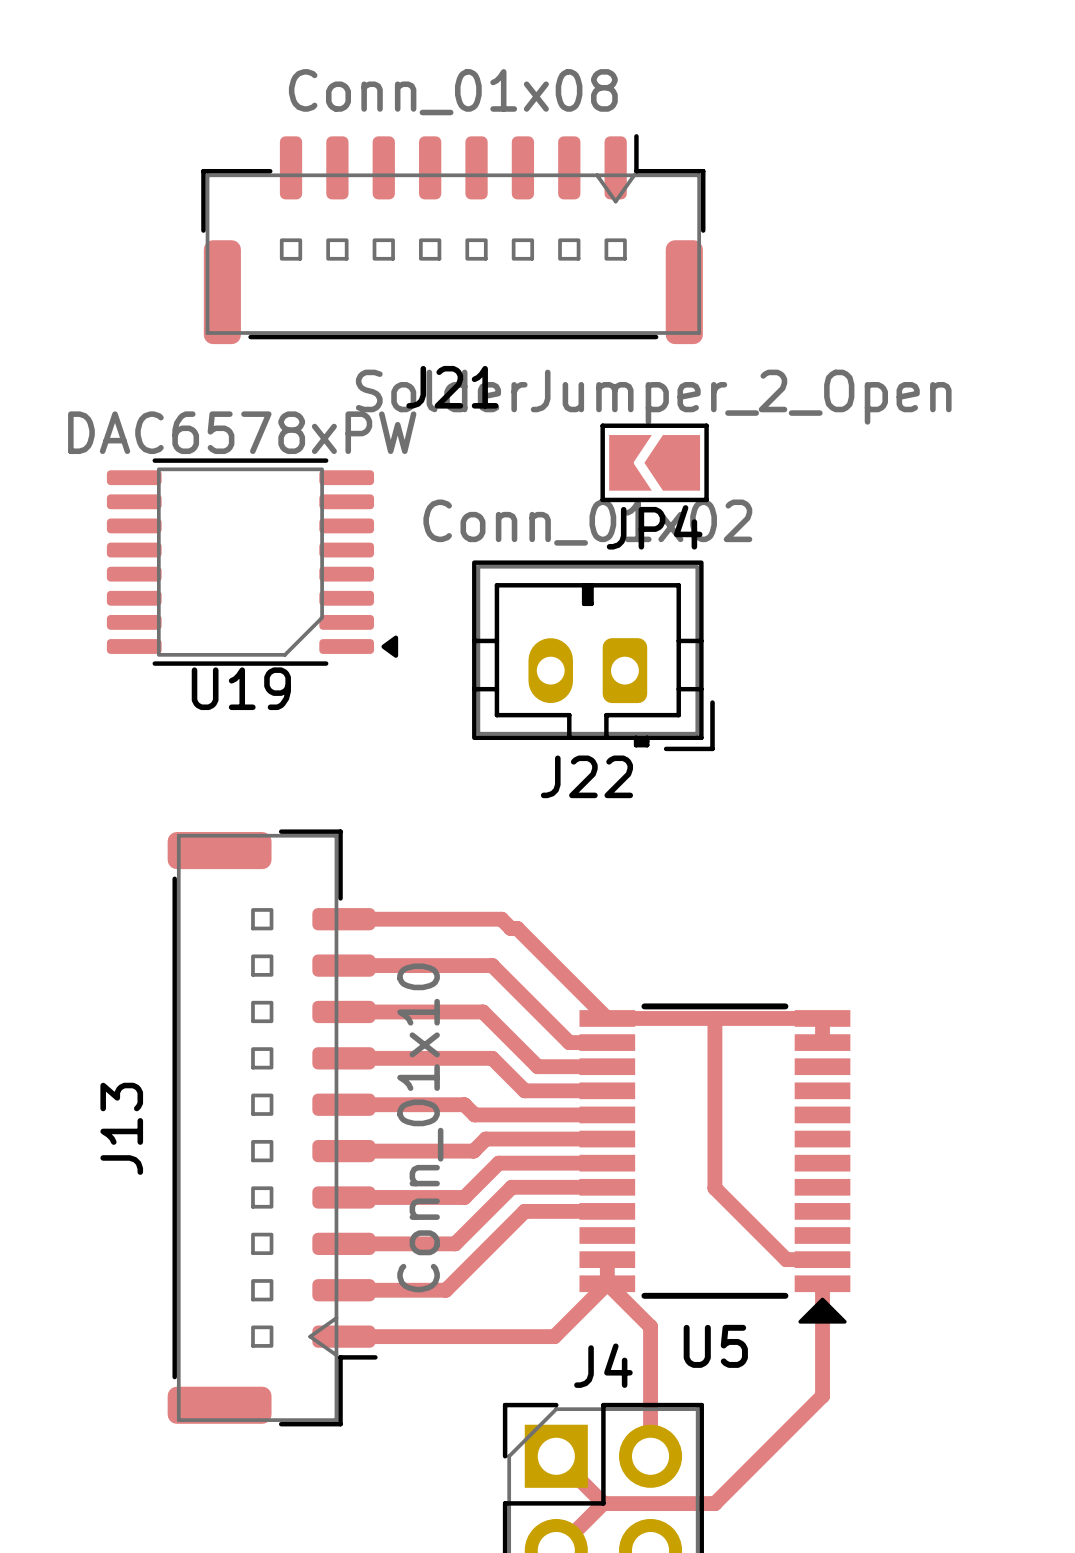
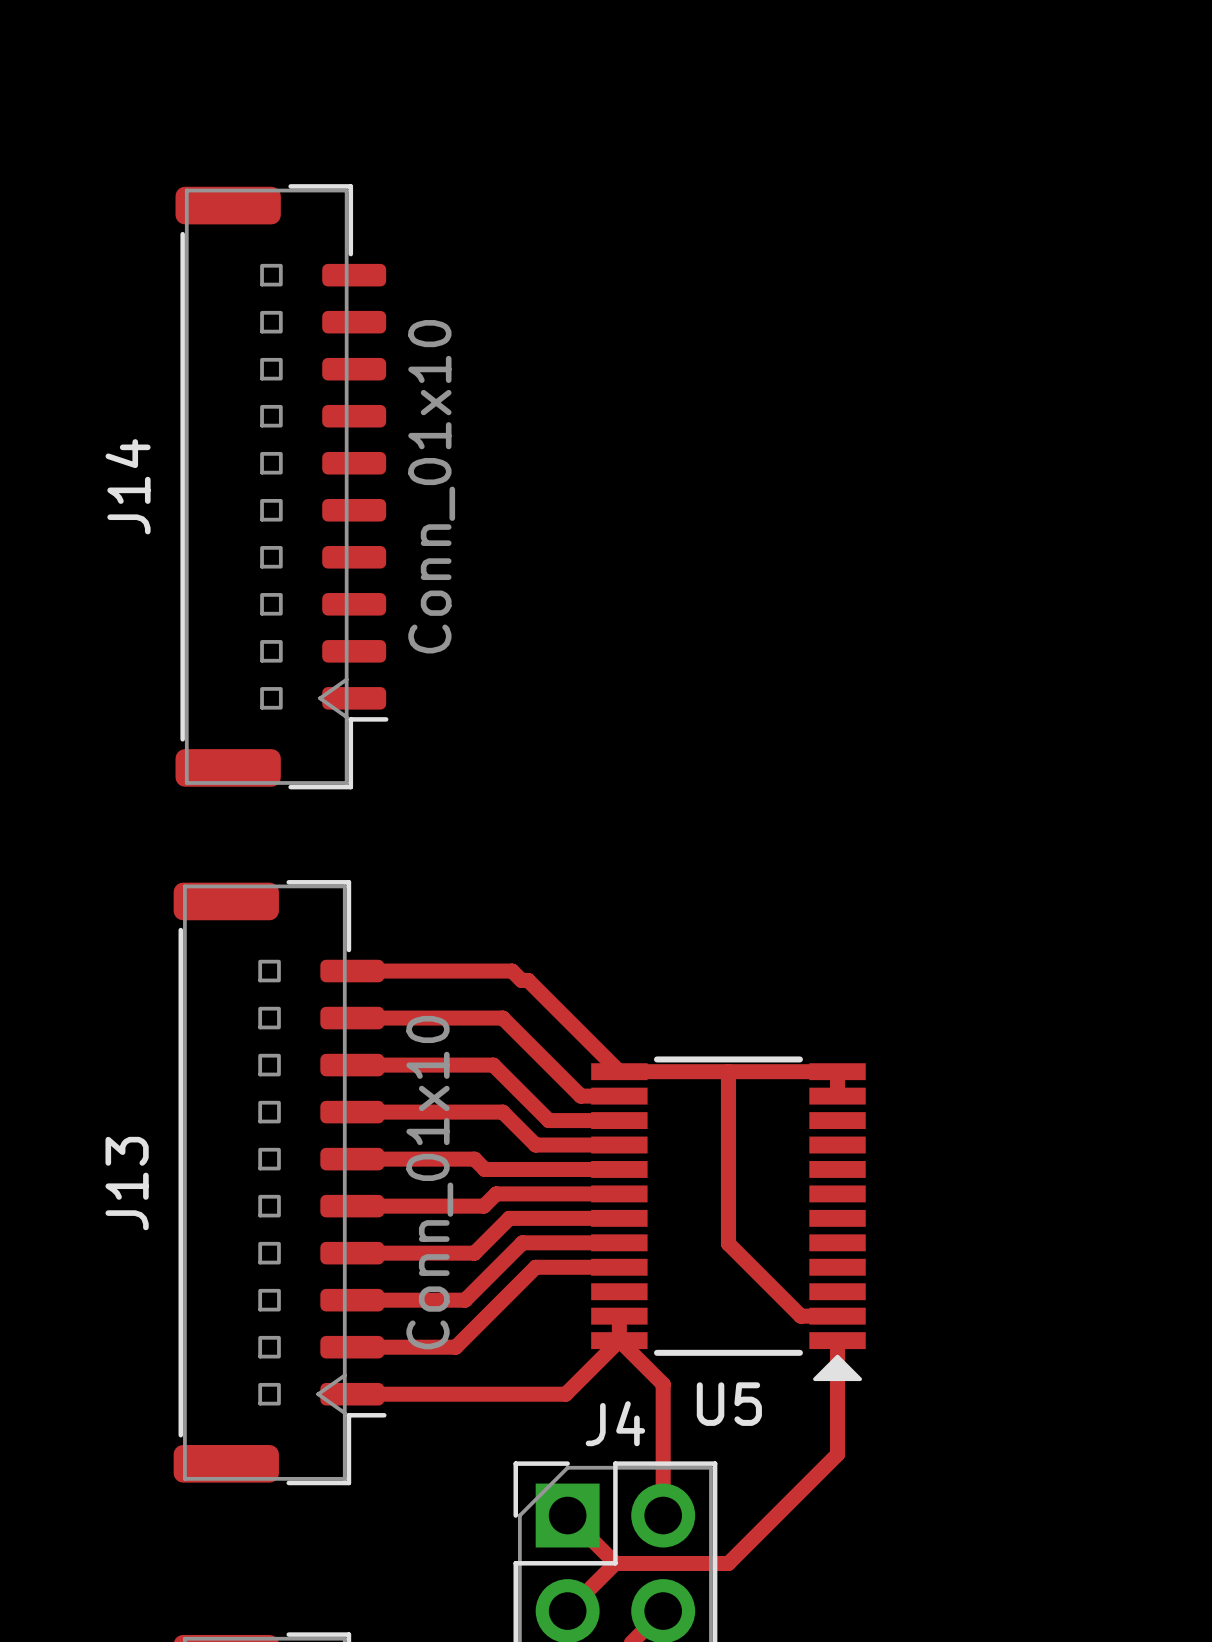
J21: Conn_01x08 (453, 239) -> none
J14: none -> Conn_01x10 (281, 486)
JP4: SolderJumper_2_Open (654, 462) -> none
U19: DAC6578xPW (252, 562) -> none
J22: Conn_01x02 (593, 655) -> none

